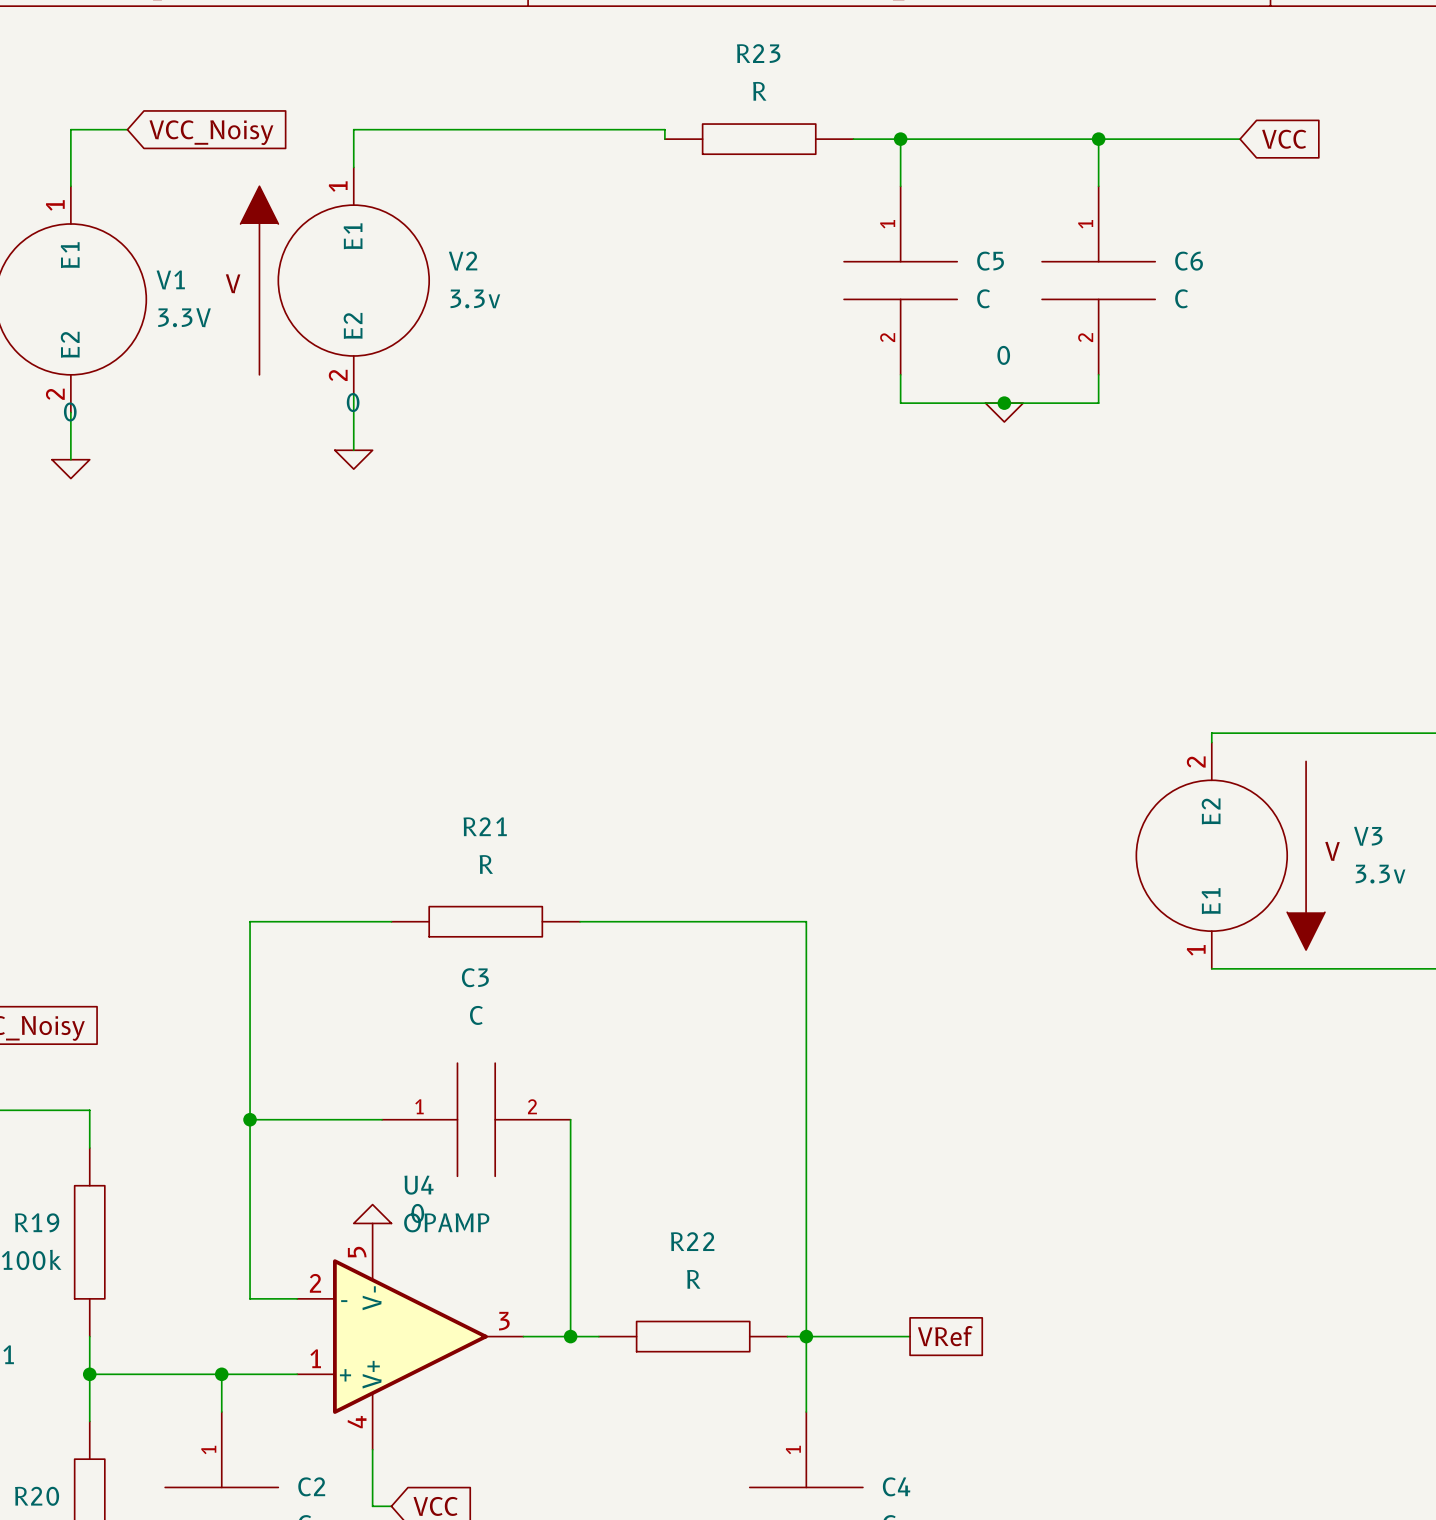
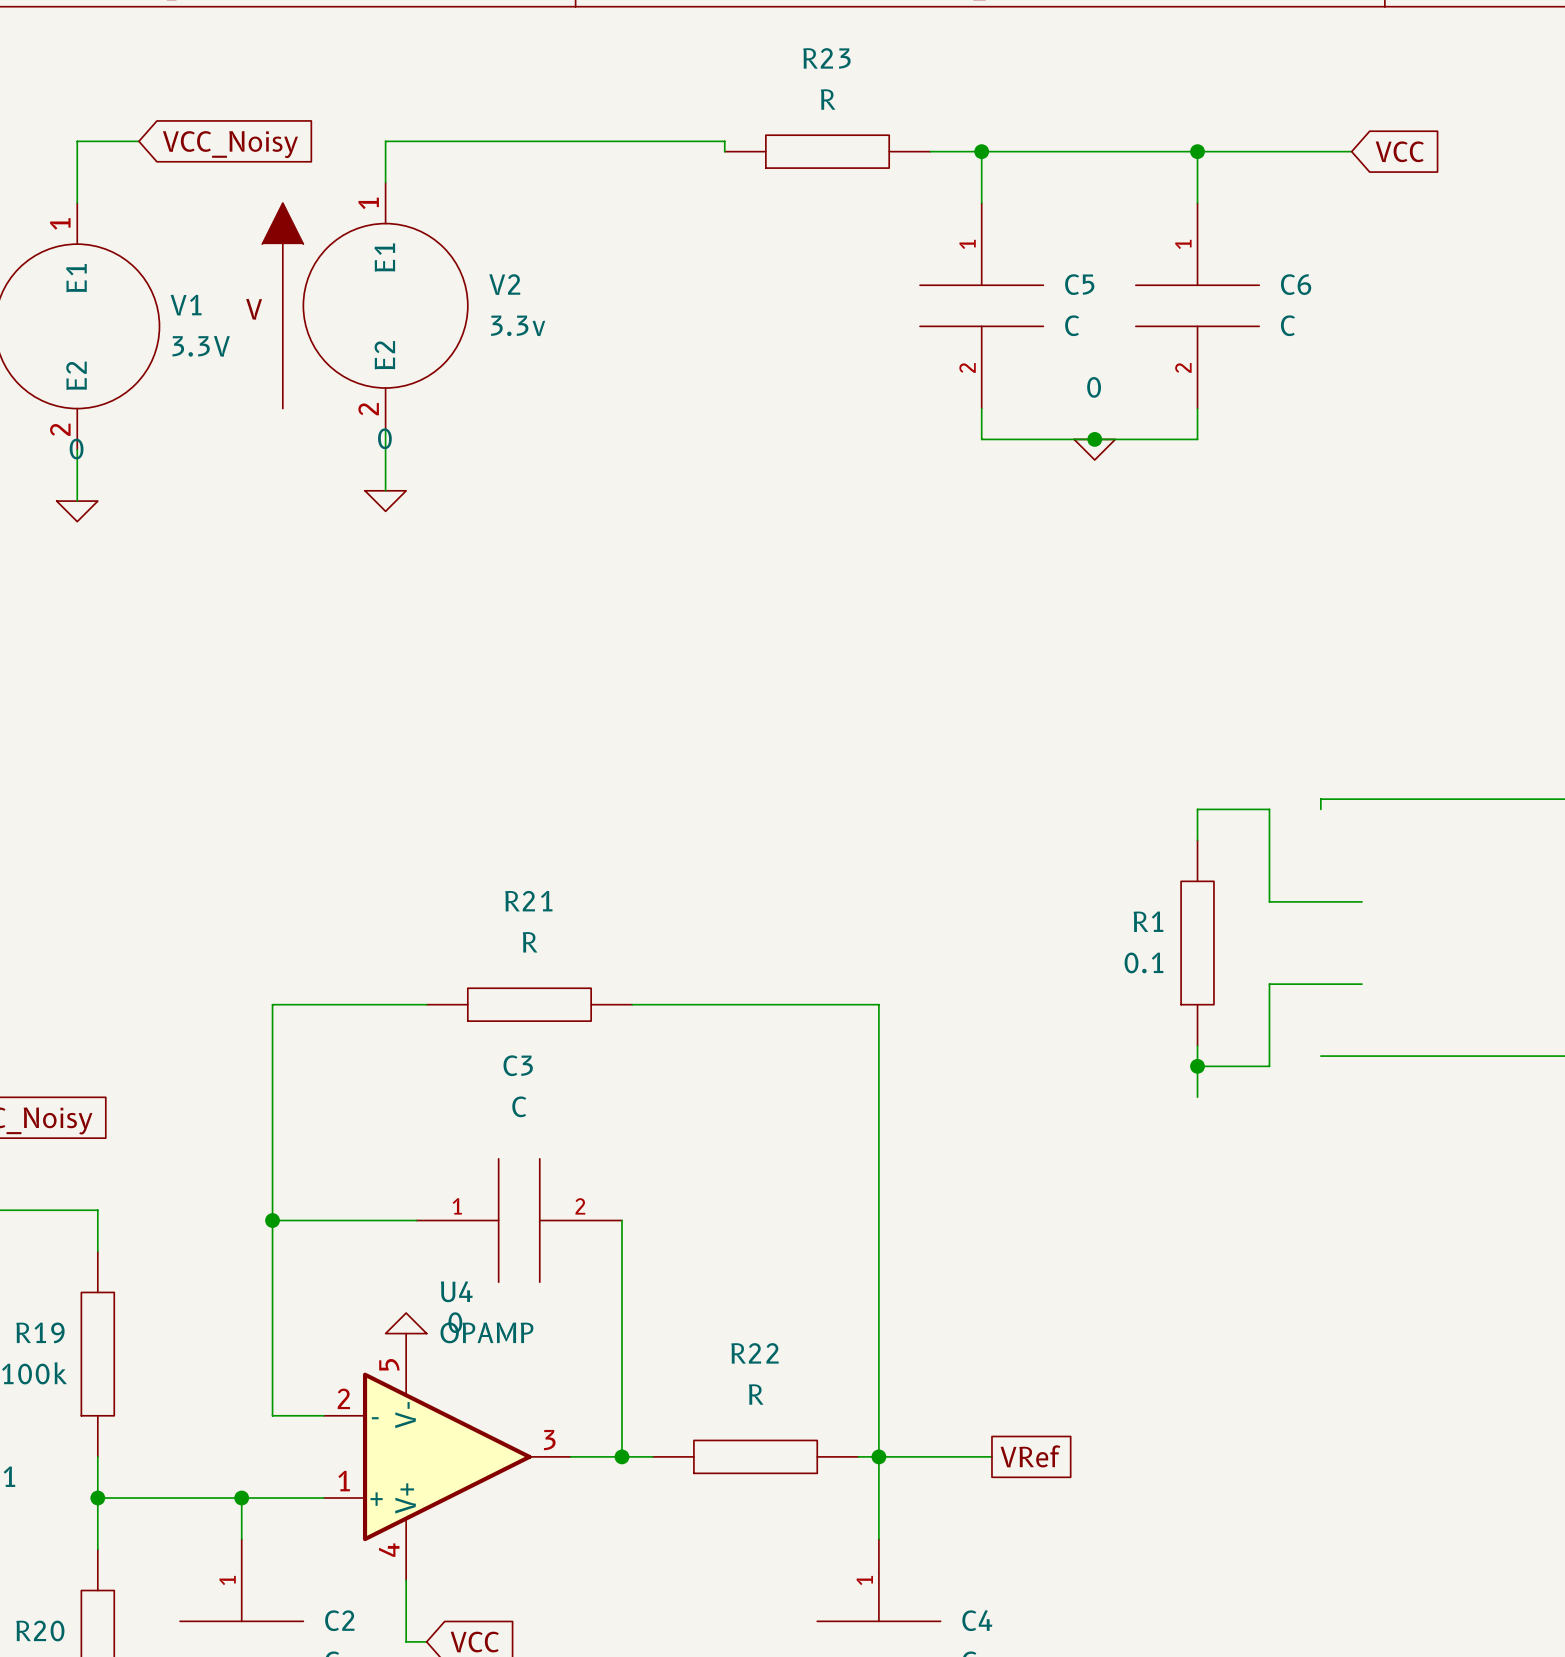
wire: none -> (1197, 840) (1197, 809) (1269, 809) (1269, 901) (1361, 901)
V3: 3.3v (1230, 855) -> none
R1: none -> 0.1 (1197, 943)
wire: none -> (1361, 984) (1269, 984) (1269, 1066) (1197, 1066)
wire: none -> (1197, 1045) (1197, 1097)
junction: none -> (1197, 1066)

